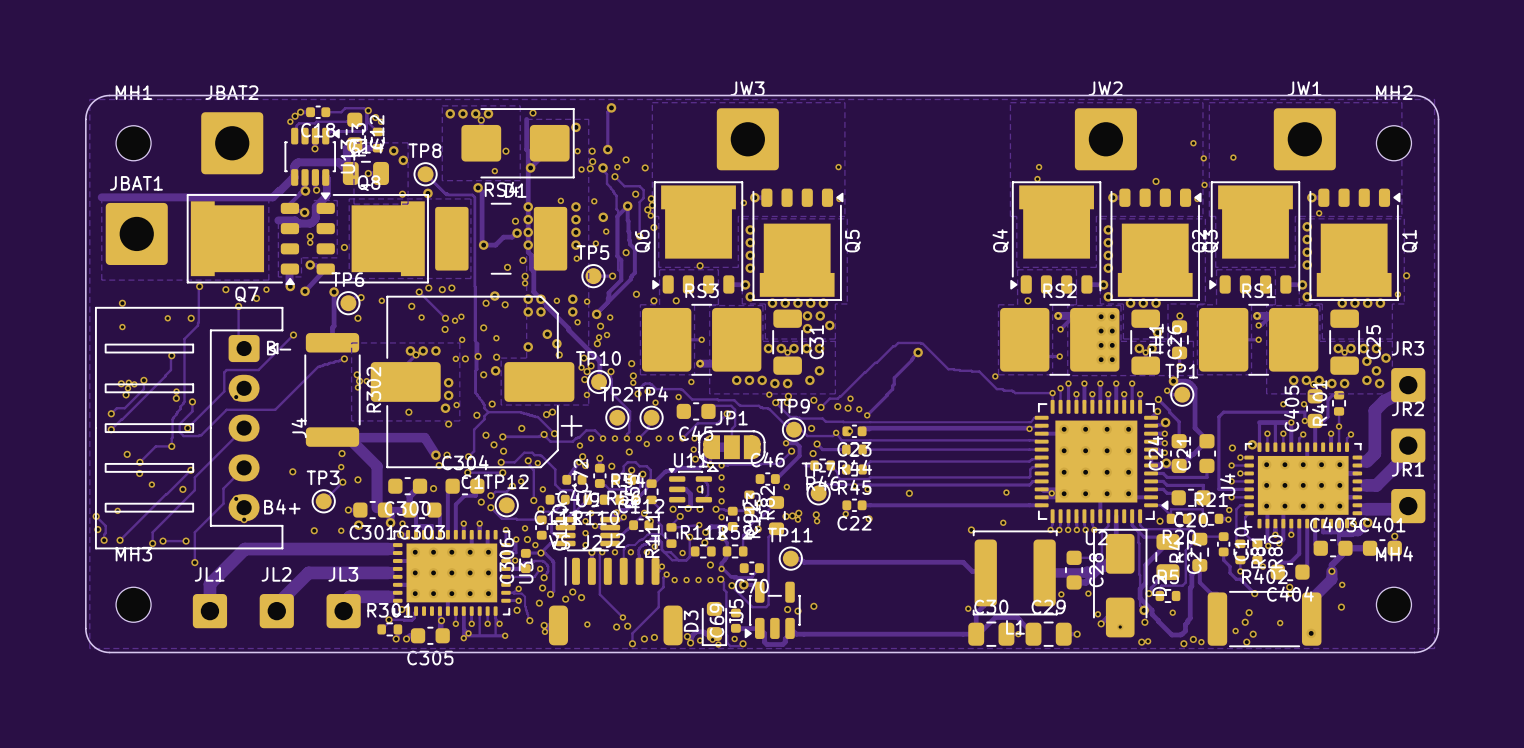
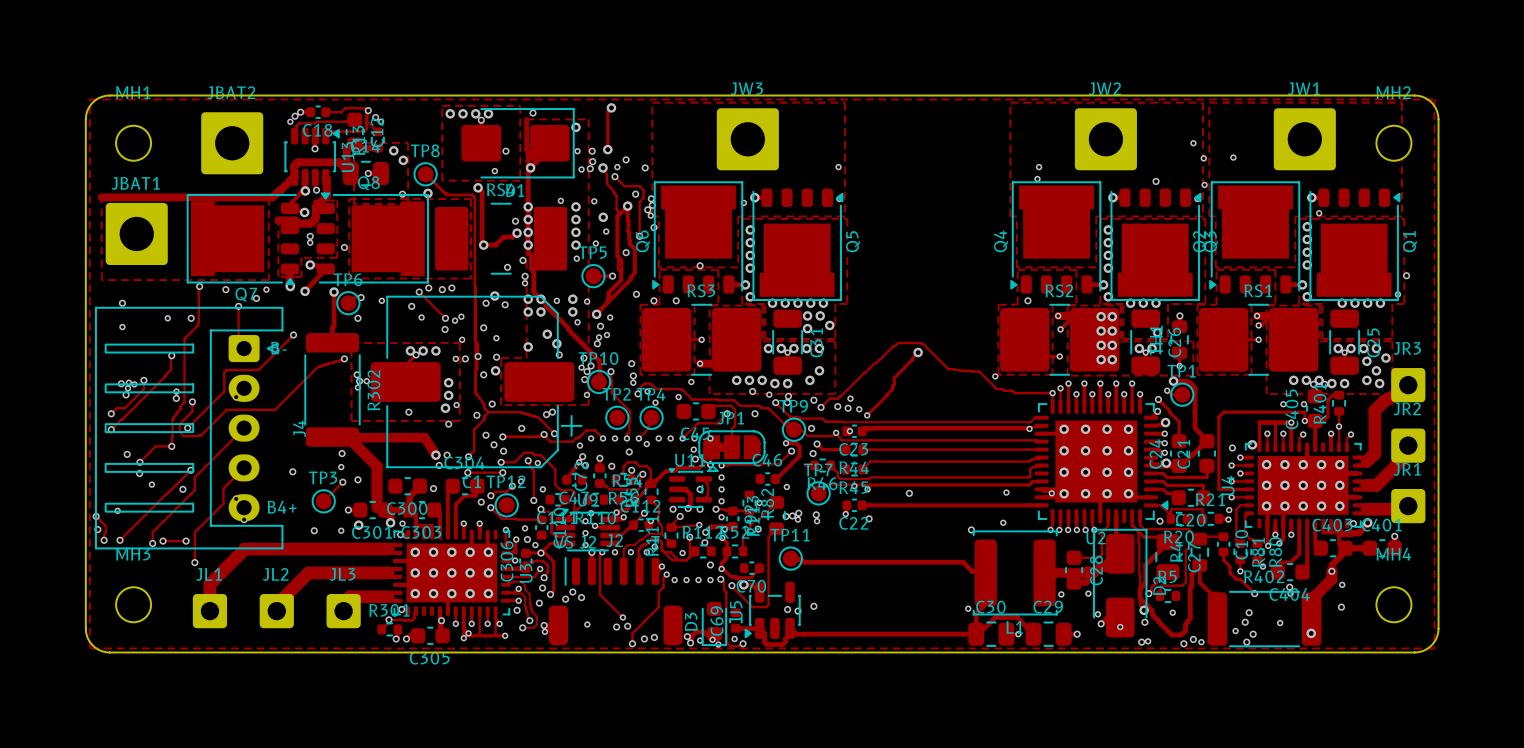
via: none -> (752, 391)
via: none -> (755, 413)
track: none -> (505, 584) (508, 582) (521, 581) (529, 594) (529, 603) (532, 611) (536, 616) (536, 624) (533, 627) (522, 627)
via: none -> (522, 627)

